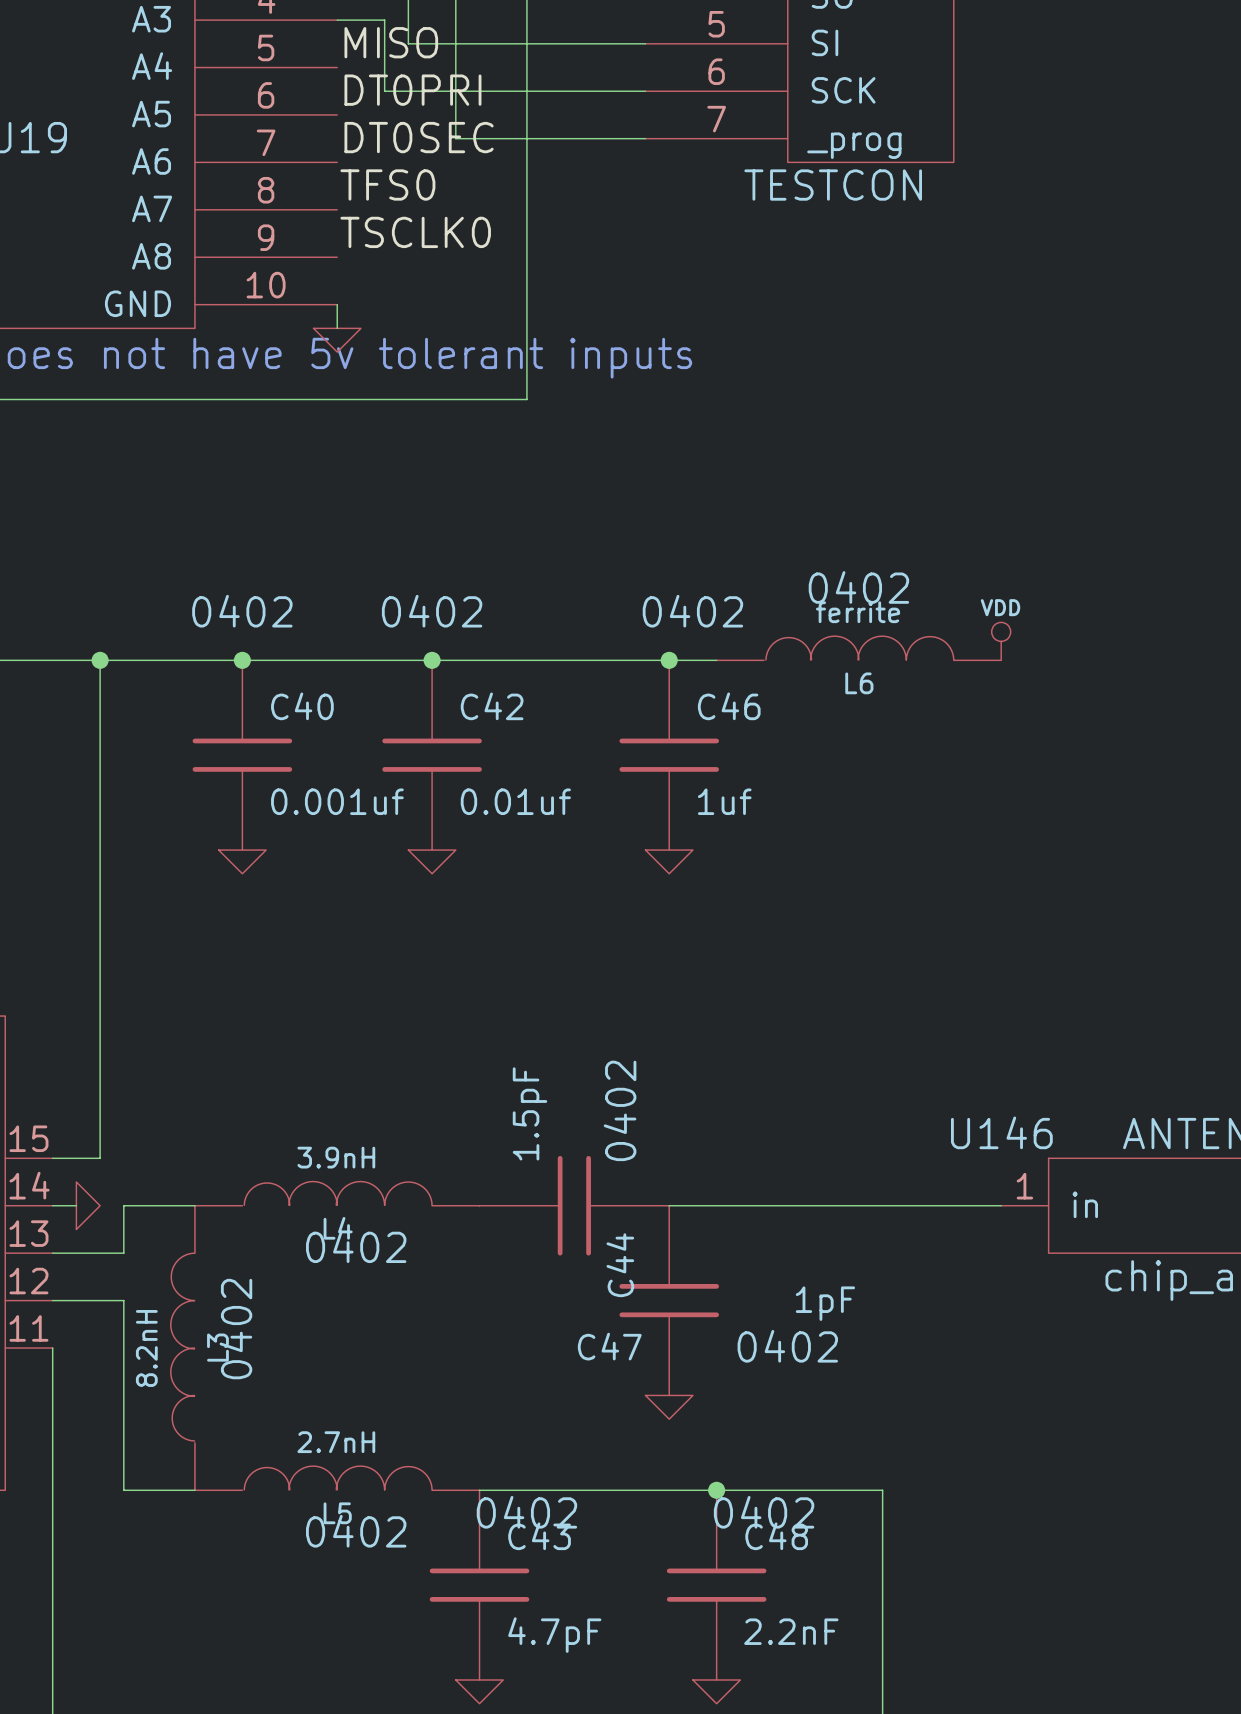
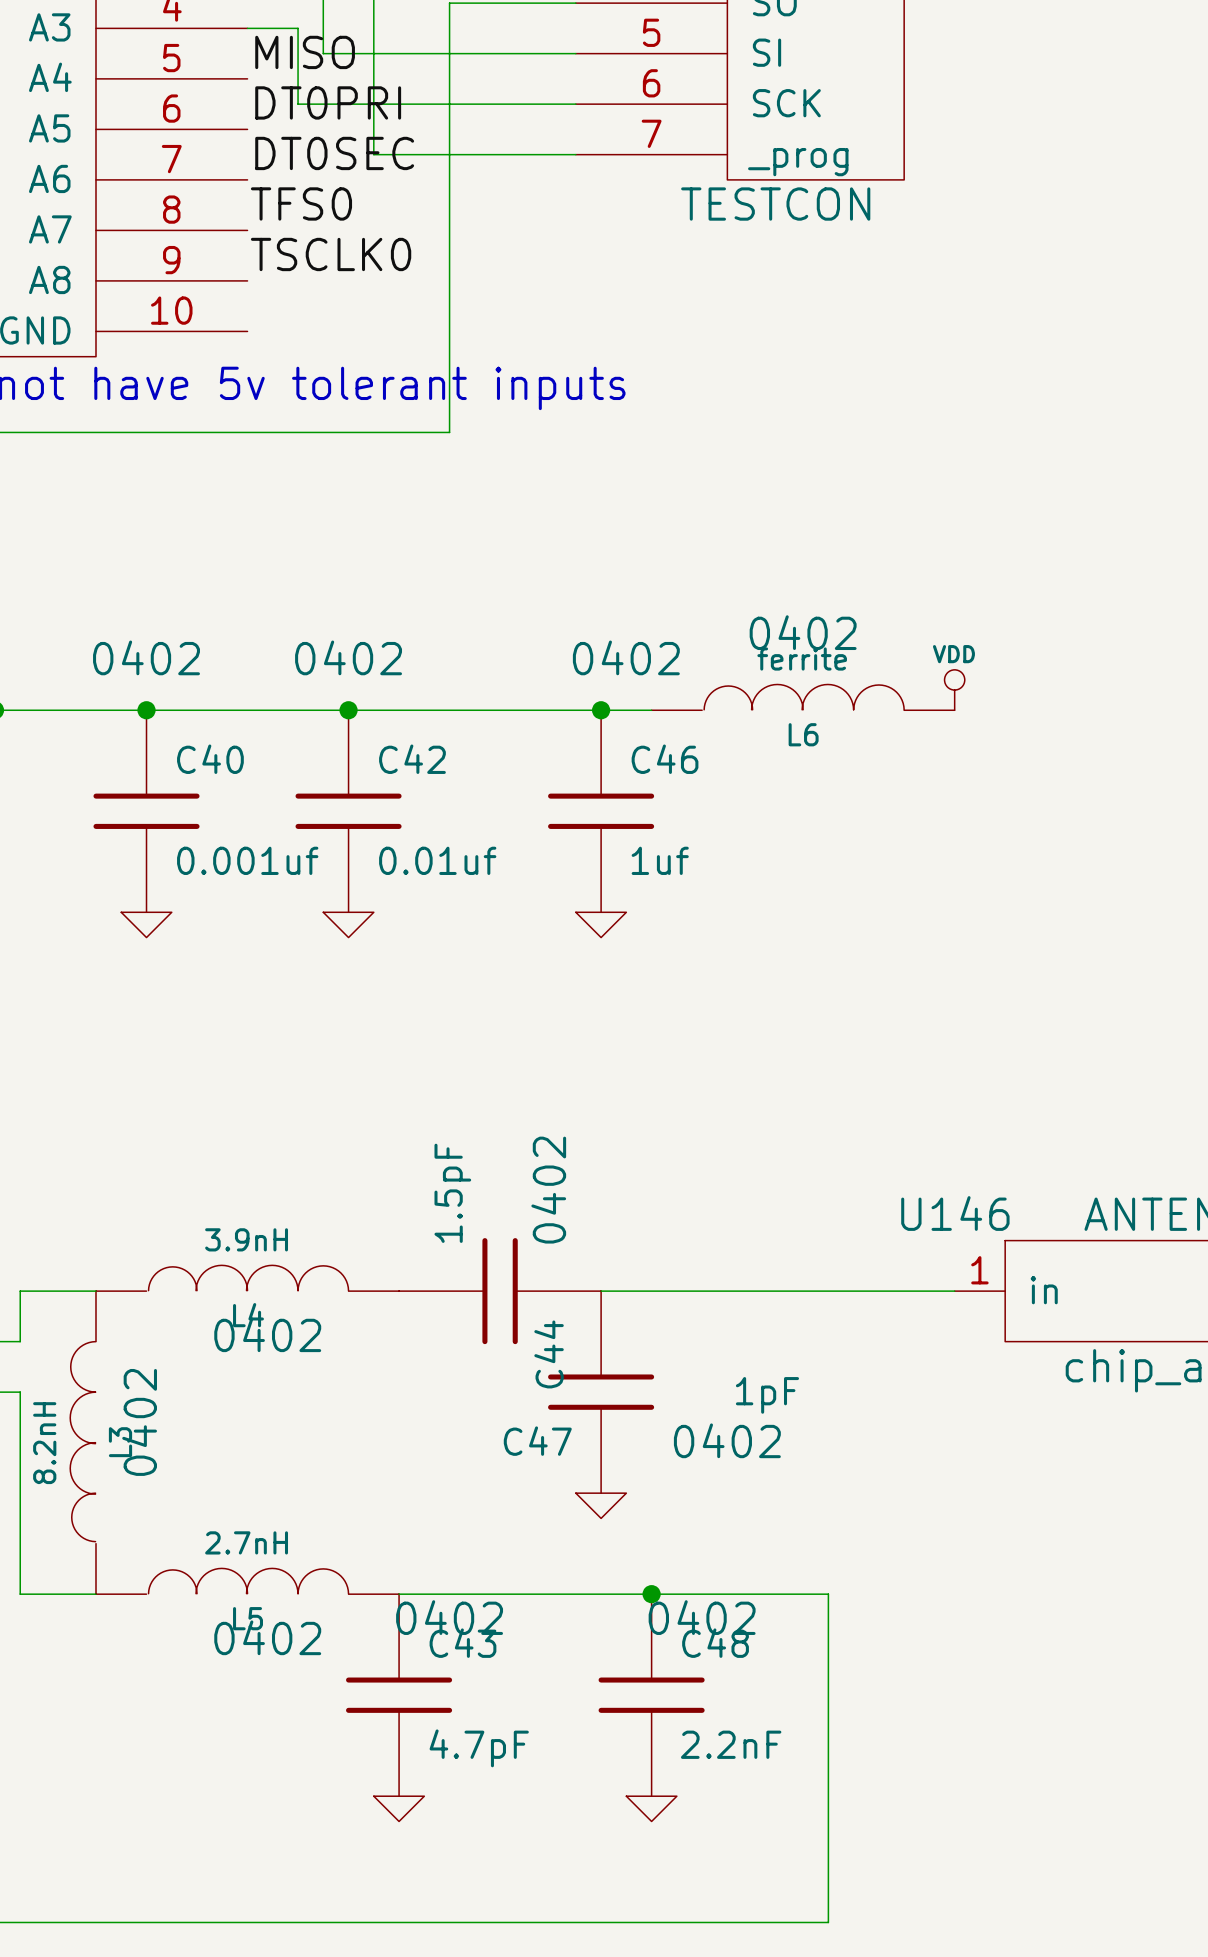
wire: (337, 304) (337, 328) -> none
power symbol: (337, 340) -> none

